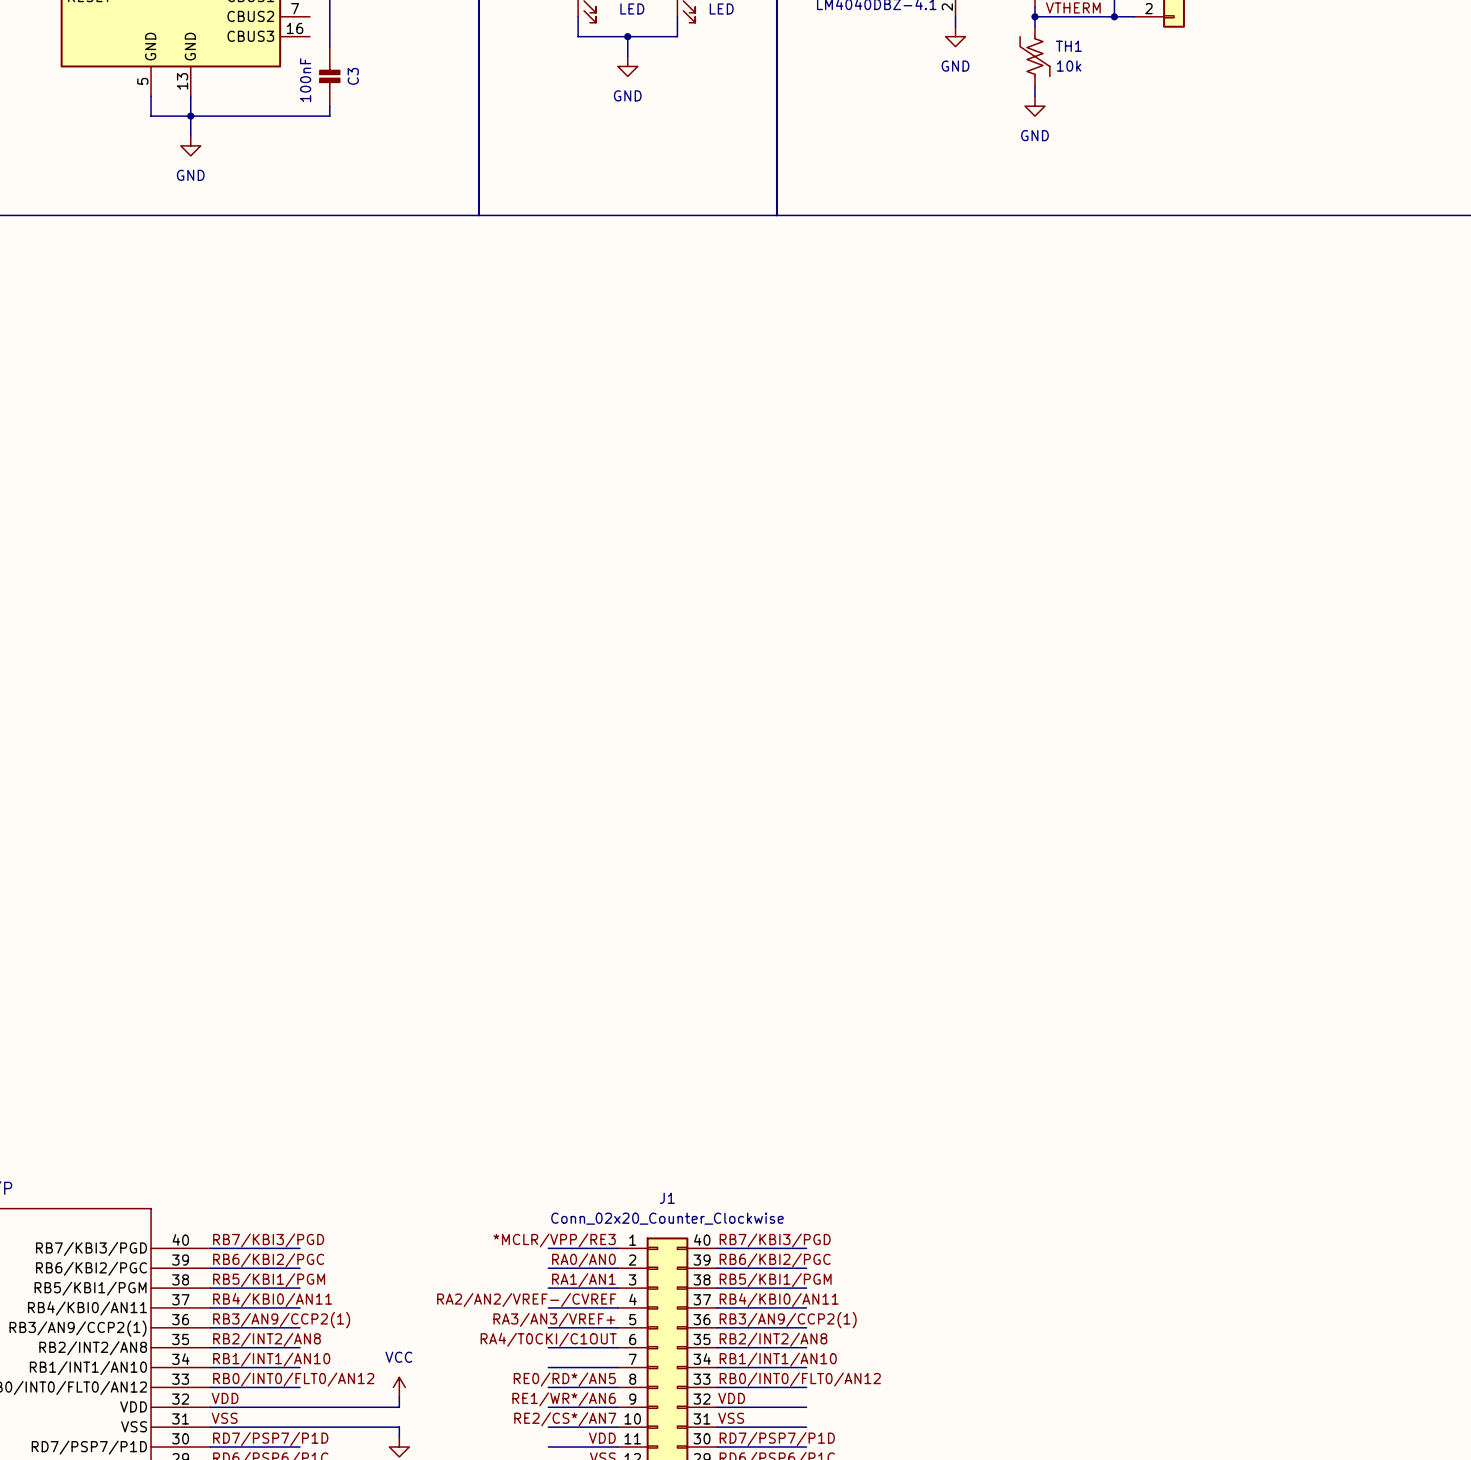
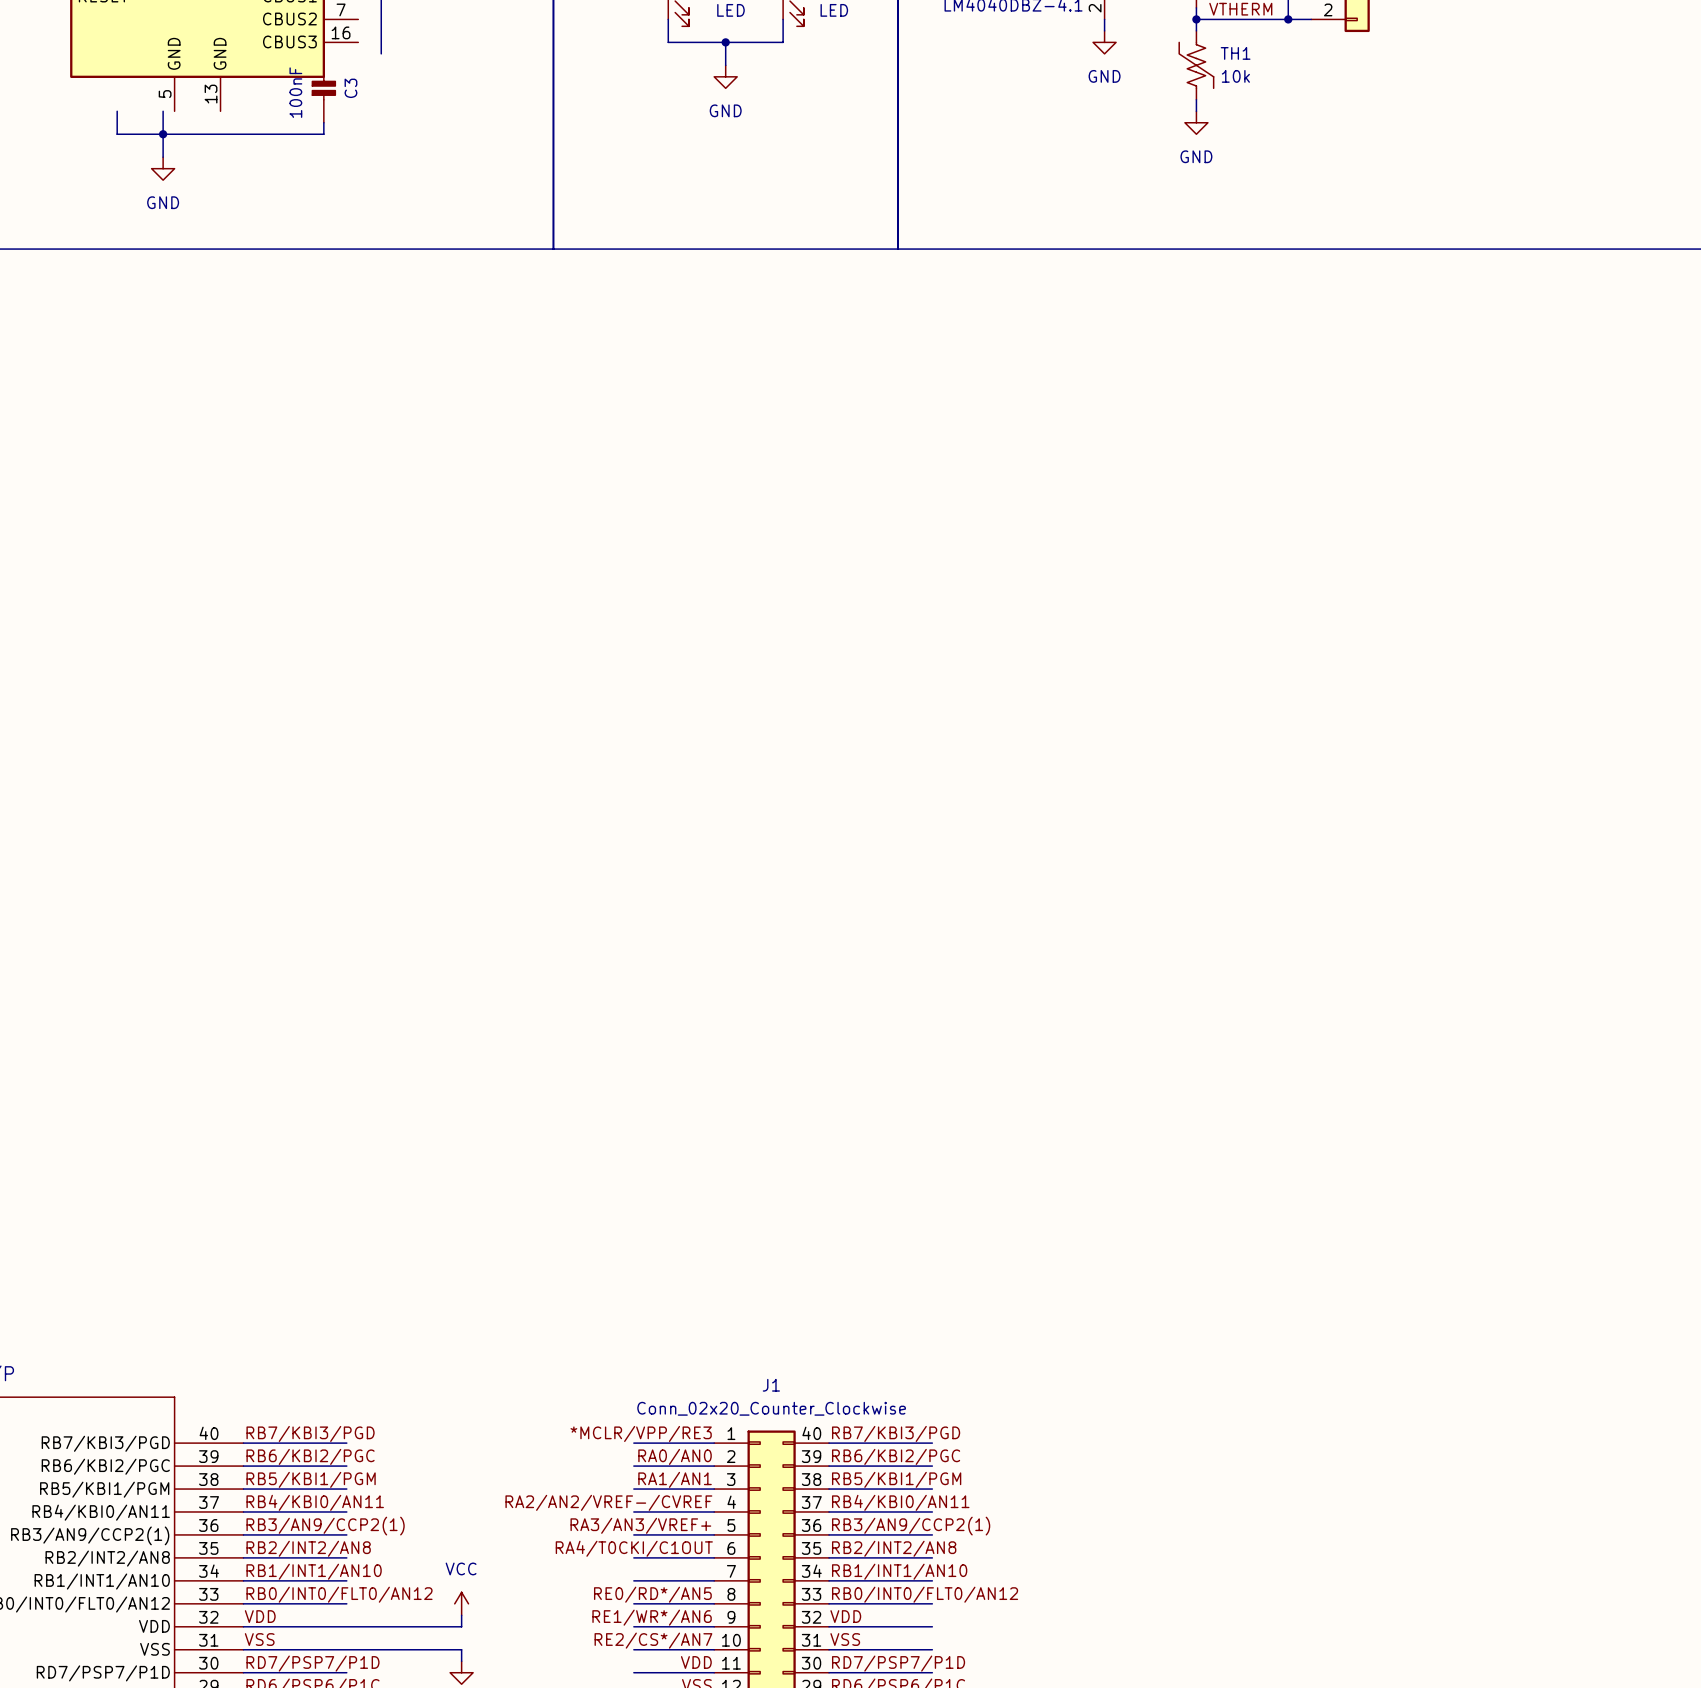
C3 position: (329, 76) -> (323, 88)
wire: (151, 96) (151, 116) -> (117, 111) (117, 134) (174, 134)
wire: (190, 96) (190, 135) -> (163, 111) (163, 157)
wire: (329, 106) (329, 116) (280, 116) -> (323, 122) (323, 134)
junction: none -> (163, 134)
junction: (190, 116) -> none
power symbol position: GND (190, 145) -> GND (163, 168)

